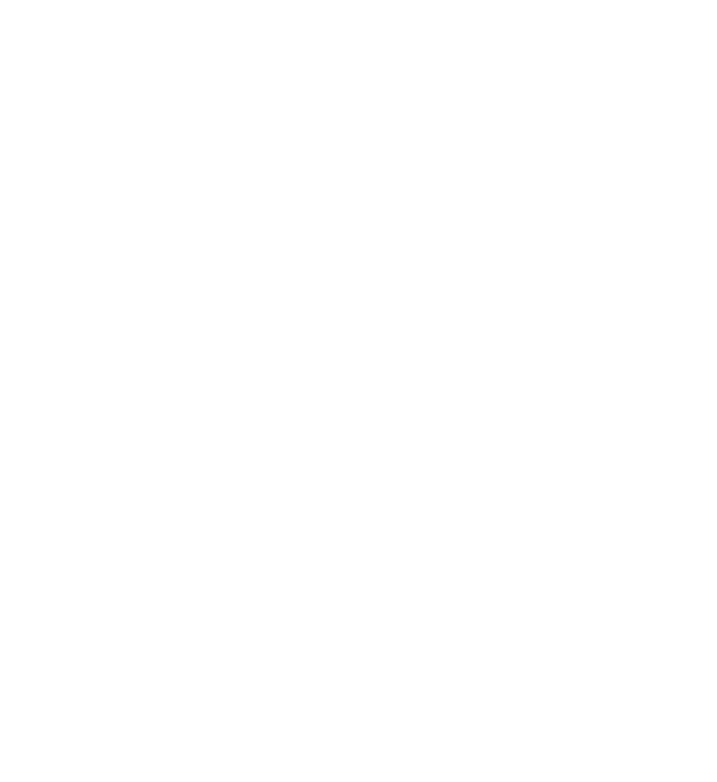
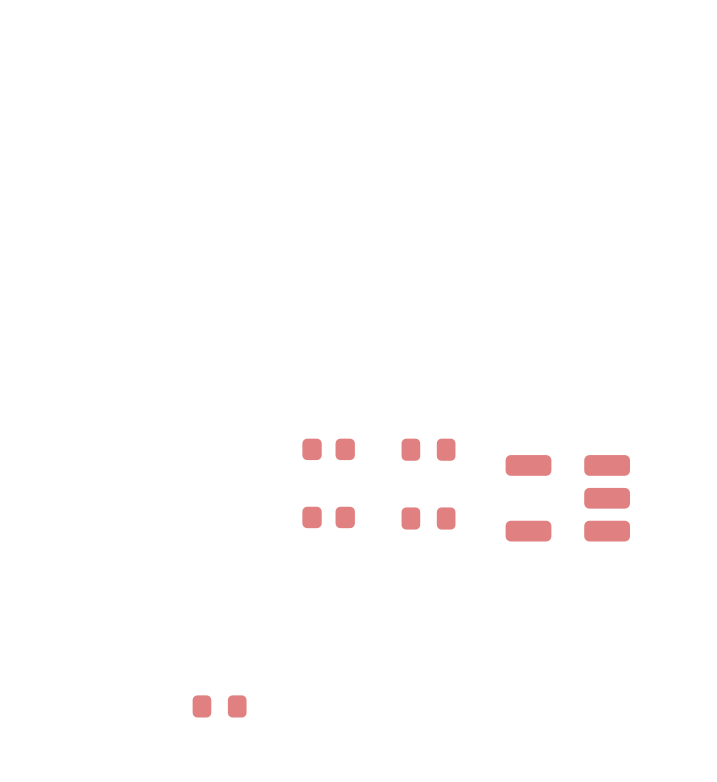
part: none -> (328, 449)
part: none -> (428, 449)
part: none -> (567, 498)
part: none -> (328, 517)
part: none -> (428, 518)
part: none -> (219, 706)

